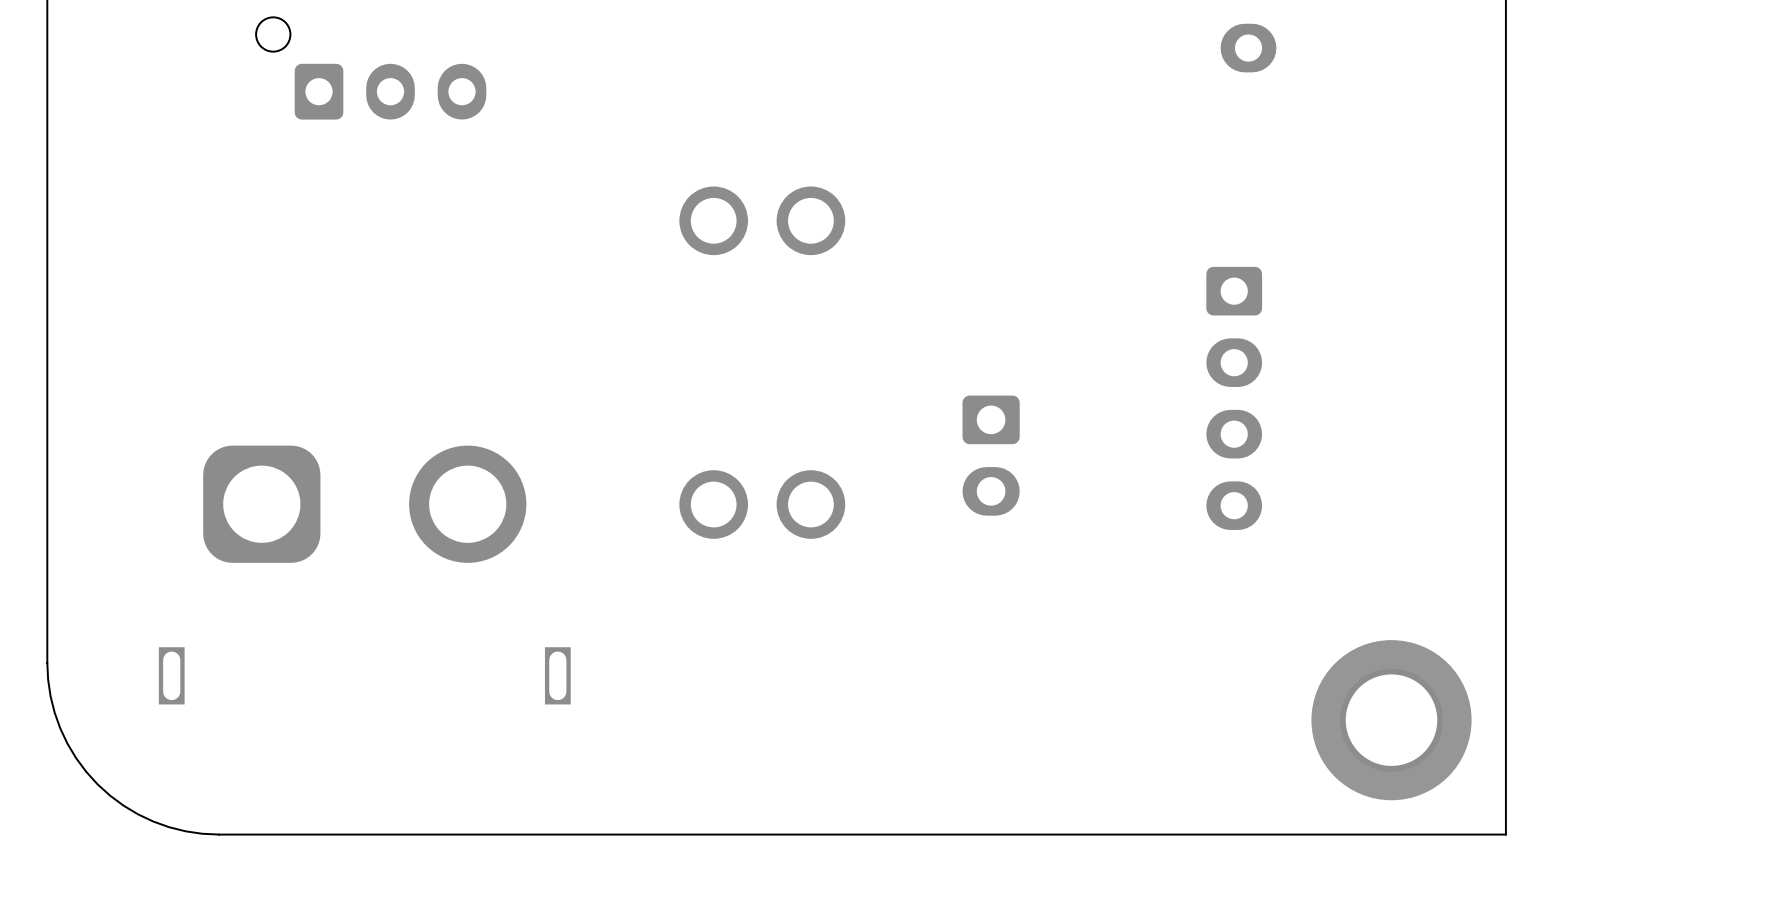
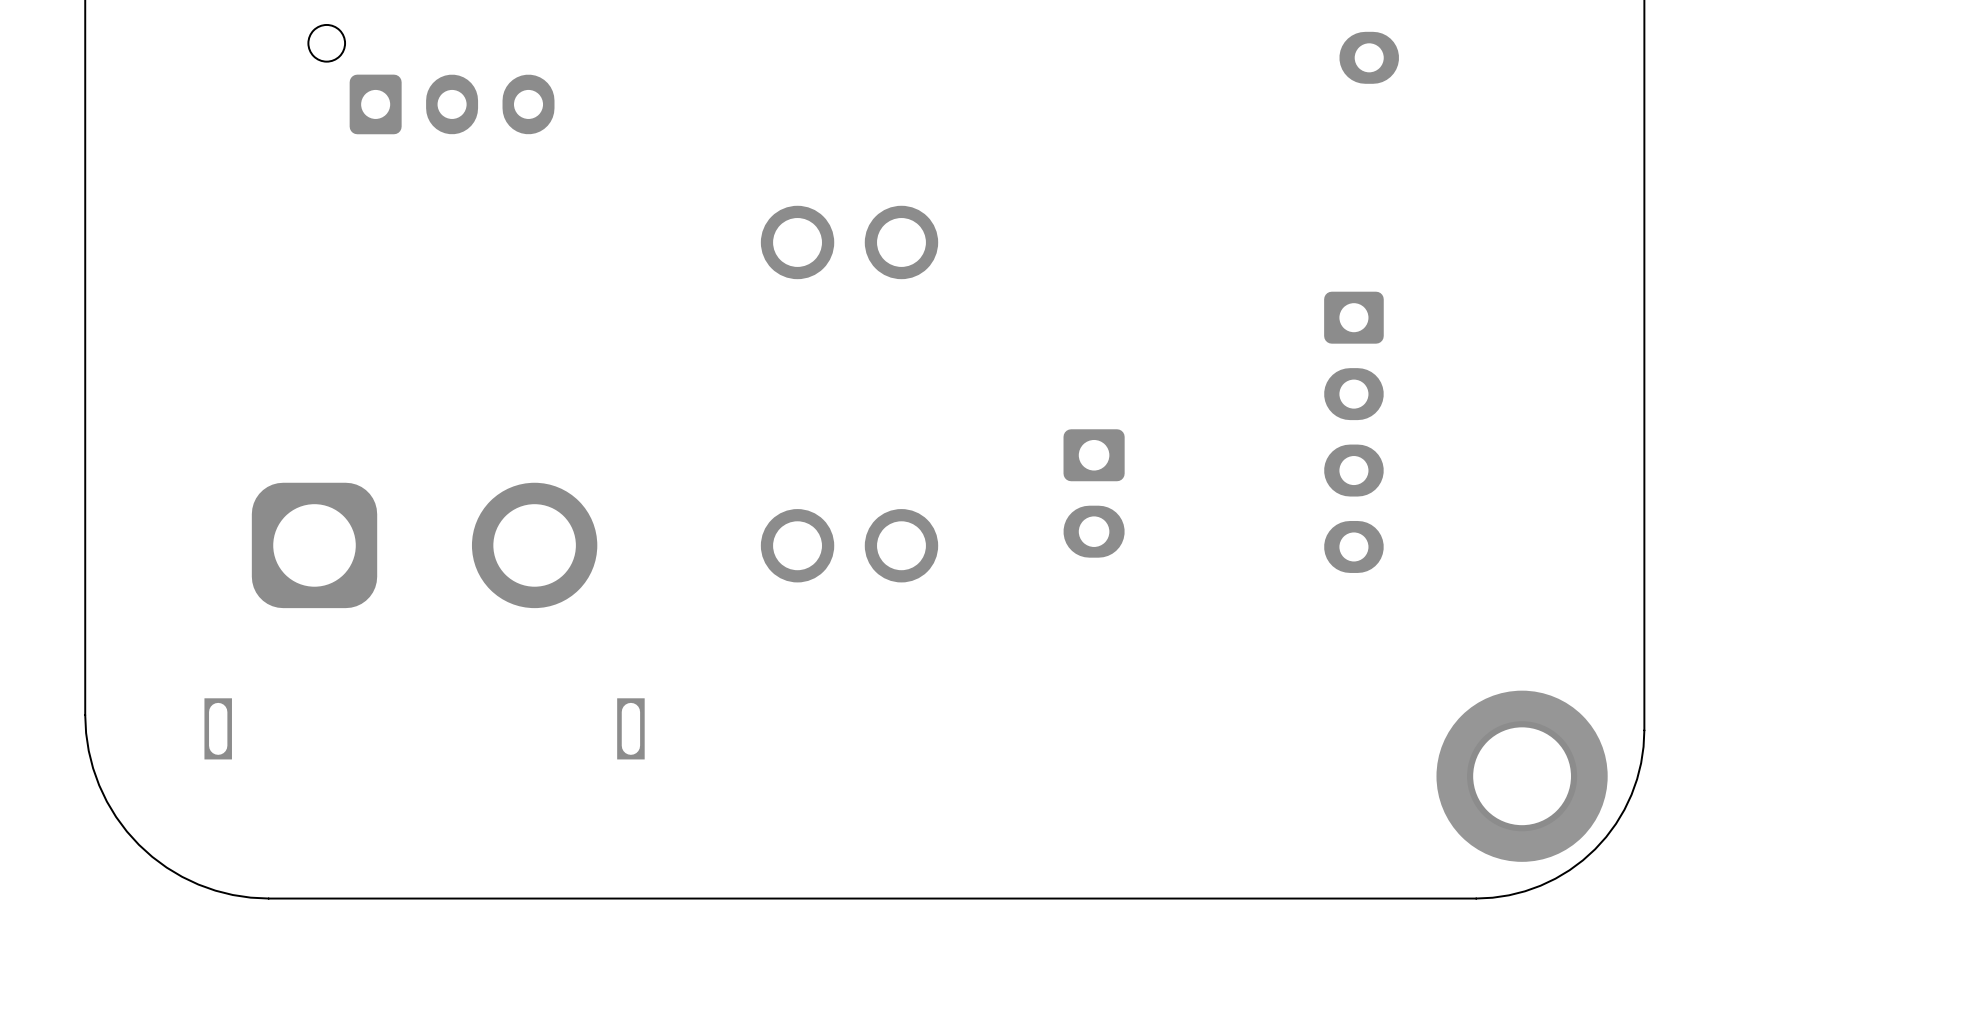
board edge: (1505, 677) (1505, 834) (1348, 834) -> (1644, 730) (1641, 763) (1631, 794) (1616, 823) (1595, 849) (1569, 870) (1540, 885) (1509, 895) (1476, 898)

